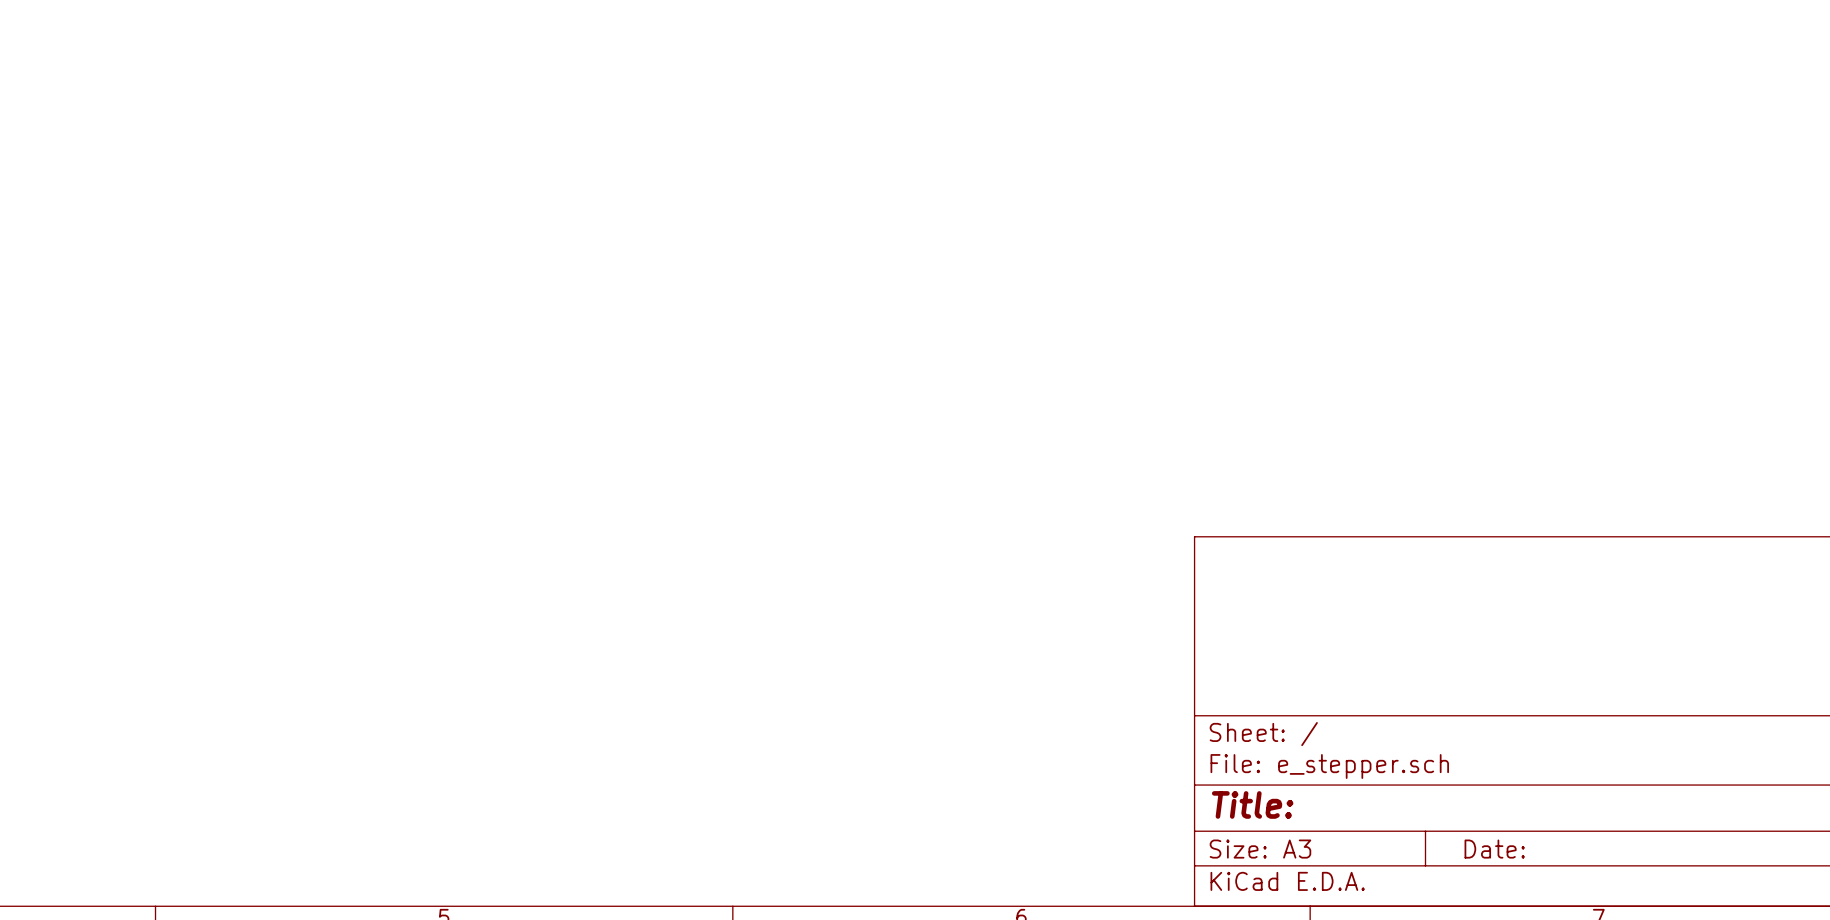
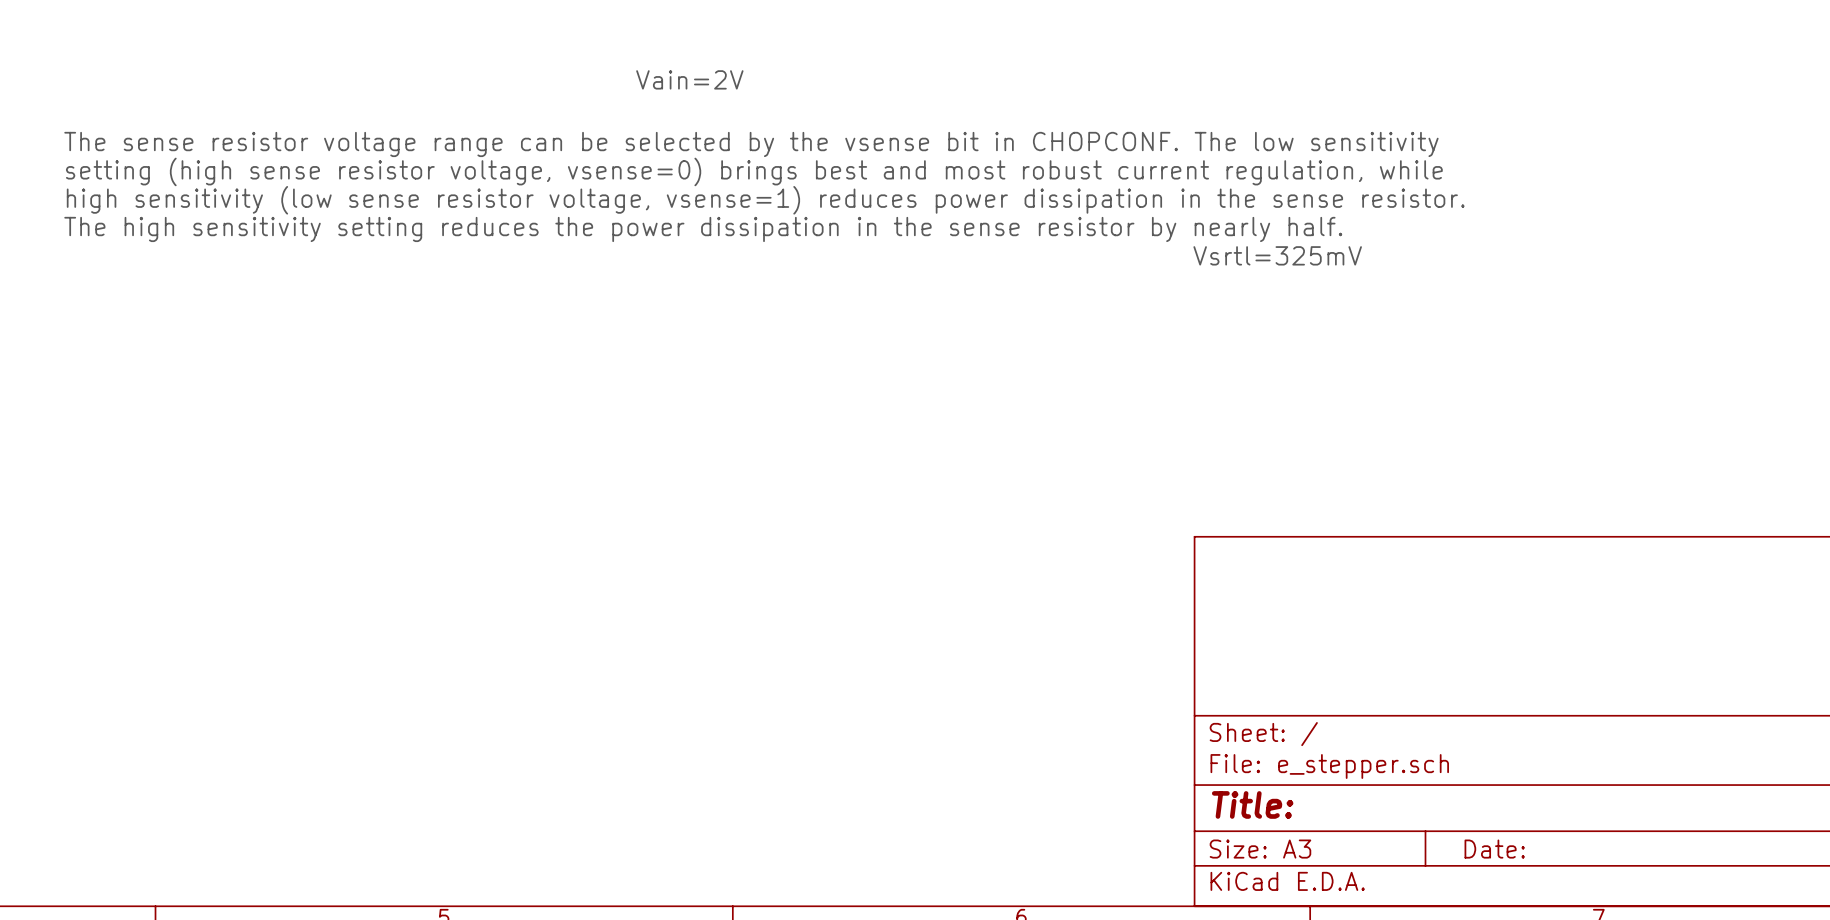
text: none -> Vain=2V (689, 79)
text: none -> The sense resistor voltage range can be selected by the vsense bit in CHOPCONF. The low sensitivity (751, 144)
text: none -> setting (high sense resistor voltage, vsense=0) brings best and most robust current regulation, while (754, 171)
text: none -> high sensitivity (low sense resistor voltage, vsense=1) reduces power dissipation in the sense resistor. (765, 200)
text: none -> The high sensitivity setting reduces the power dissipation in the sense resistor by nearly half. (703, 229)
text: none -> Vsrtl=325mV (1277, 255)

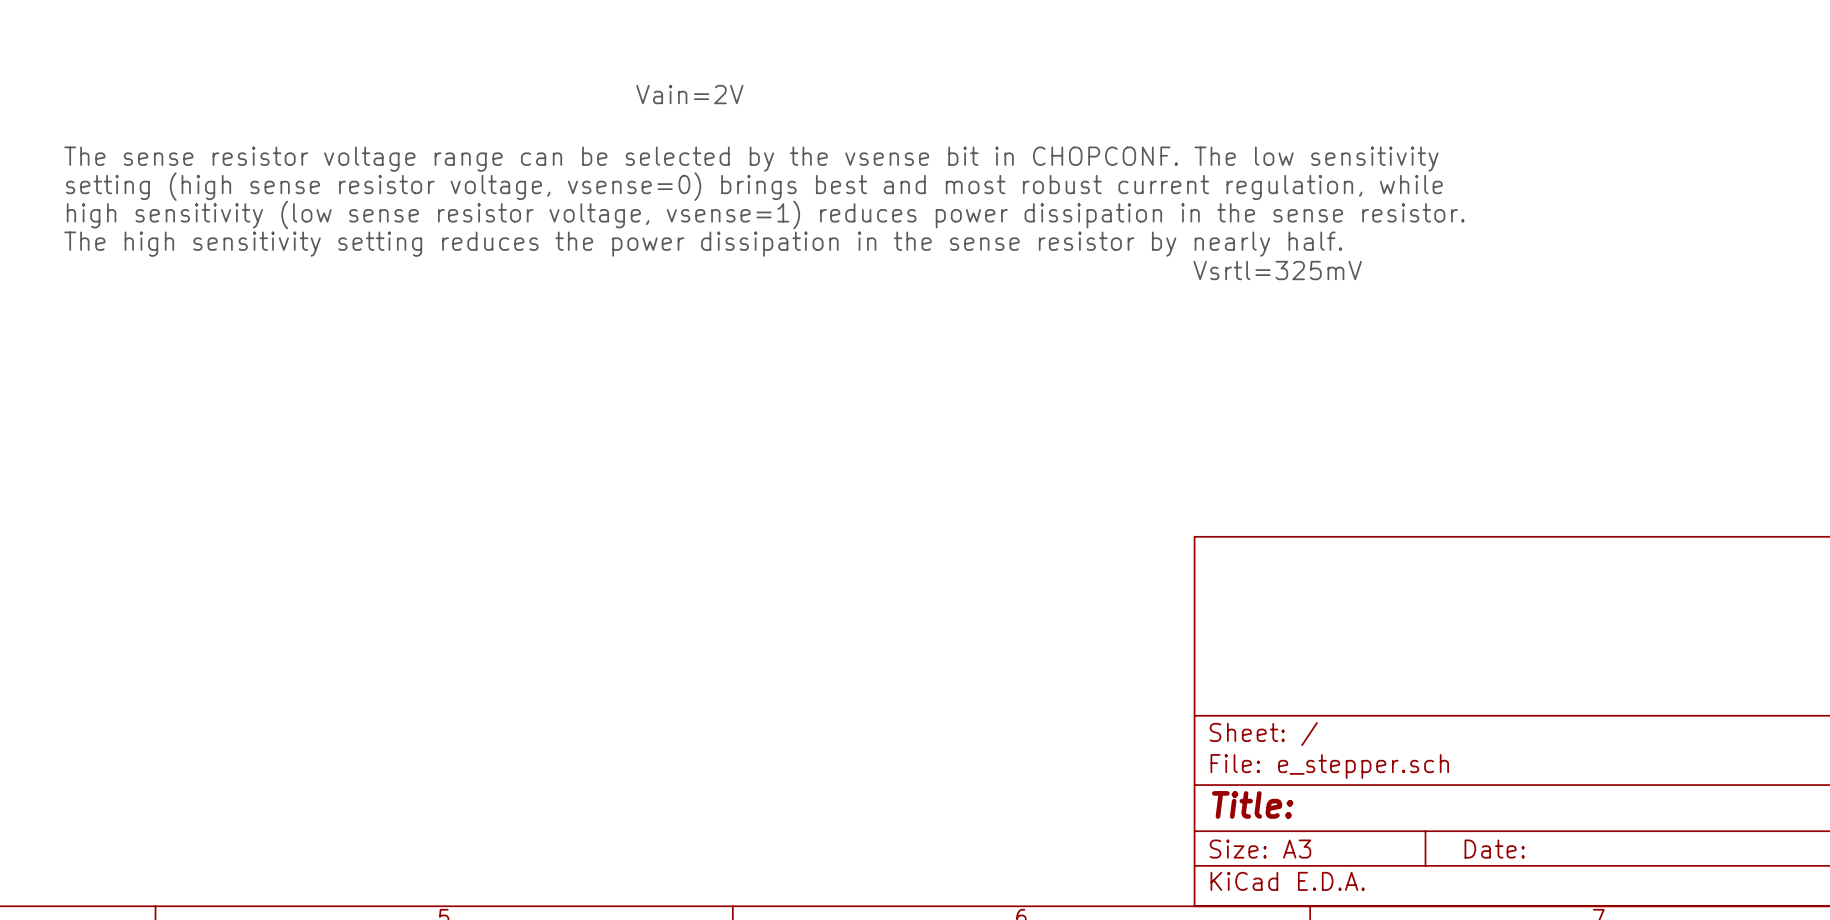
text position: Vain=2V (689, 79) -> Vain=2V (689, 94)
text position: The sense resistor voltage range can be selected by the vsense bit in CHOPCONF. The low sensitivity (751, 144) -> The sense resistor voltage range can be selected by the vsense bit in CHOPCONF. The low sensitivity (751, 159)
text position: setting (high sense resistor voltage, vsense=0) brings best and most robust current regulation, while (754, 171) -> setting (high sense resistor voltage, vsense=0) brings best and most robust current regulation, while (754, 186)
text position: high sensitivity (low sense resistor voltage, vsense=1) reduces power dissipation in the sense resistor. (765, 200) -> high sensitivity (low sense resistor voltage, vsense=1) reduces power dissipation in the sense resistor. (765, 214)
text position: The high sensitivity setting reduces the power dissipation in the sense resistor by nearly half. (703, 229) -> The high sensitivity setting reduces the power dissipation in the sense resistor by nearly half. (703, 244)
text position: Vsrtl=325mV (1277, 255) -> Vsrtl=325mV (1277, 270)

